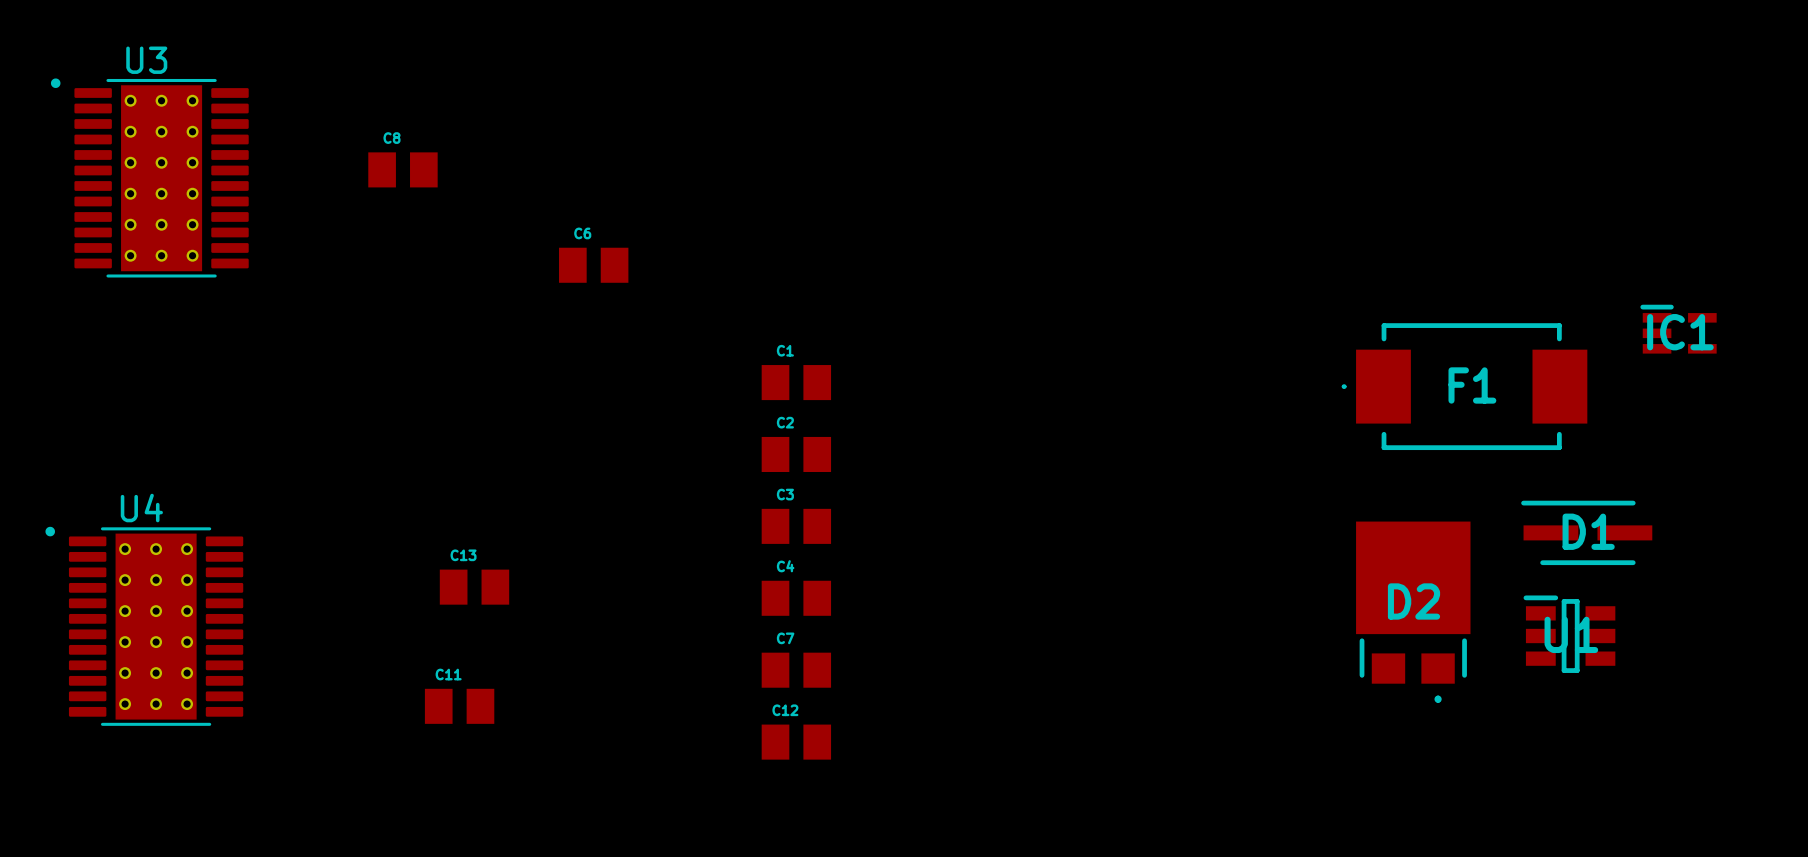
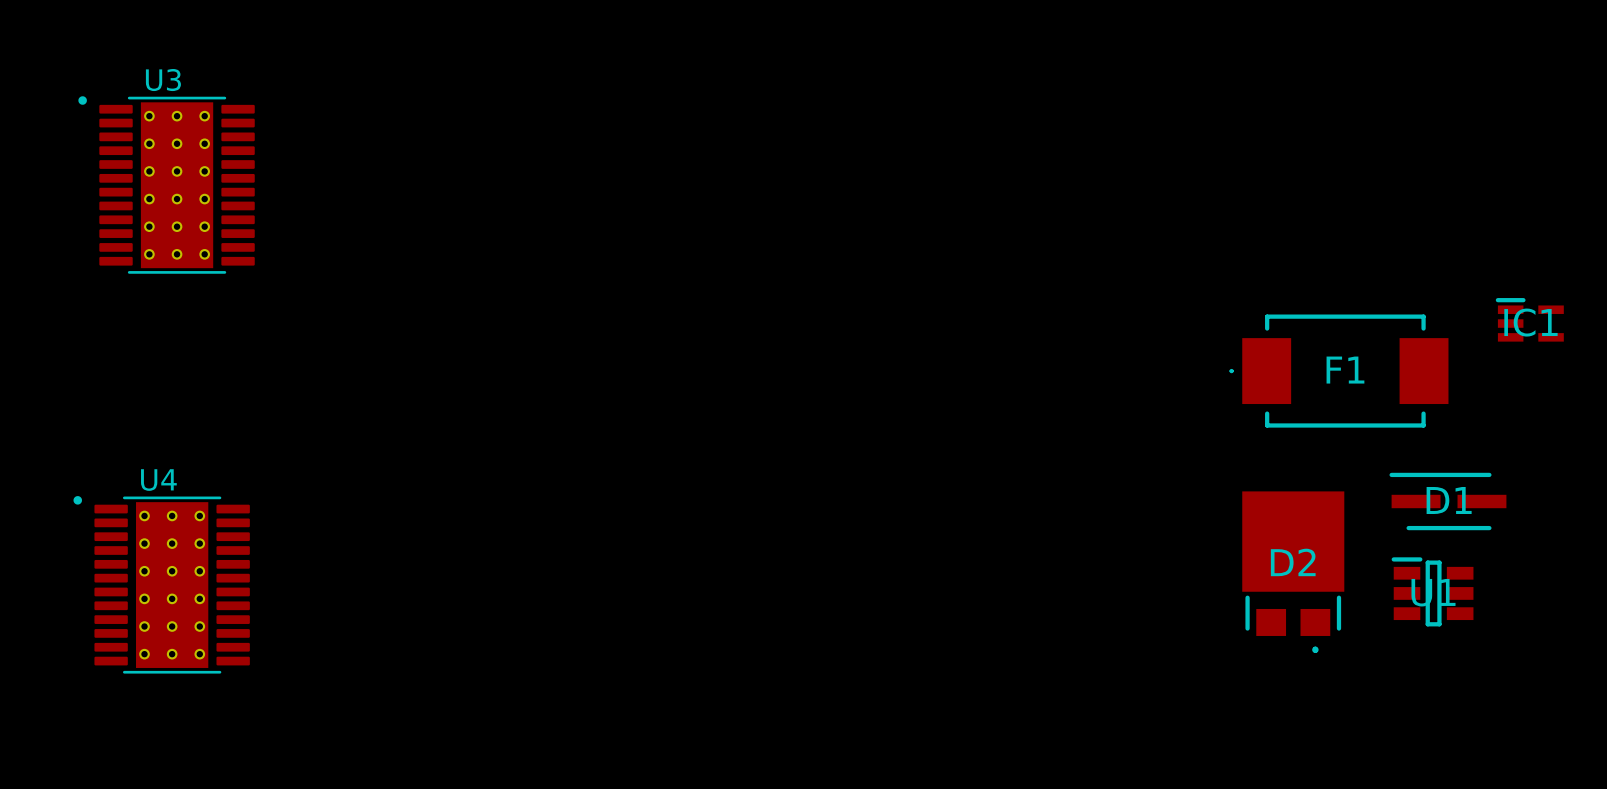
C8: (402, 169) -> none
C6: (593, 265) -> none
C1: (796, 382) -> none
C2: (796, 454) -> none
C3: (796, 526) -> none
C13: (474, 587) -> none
C4: (796, 598) -> none
C7: (796, 670) -> none
C11: (459, 706) -> none
C12: (796, 742) -> none

